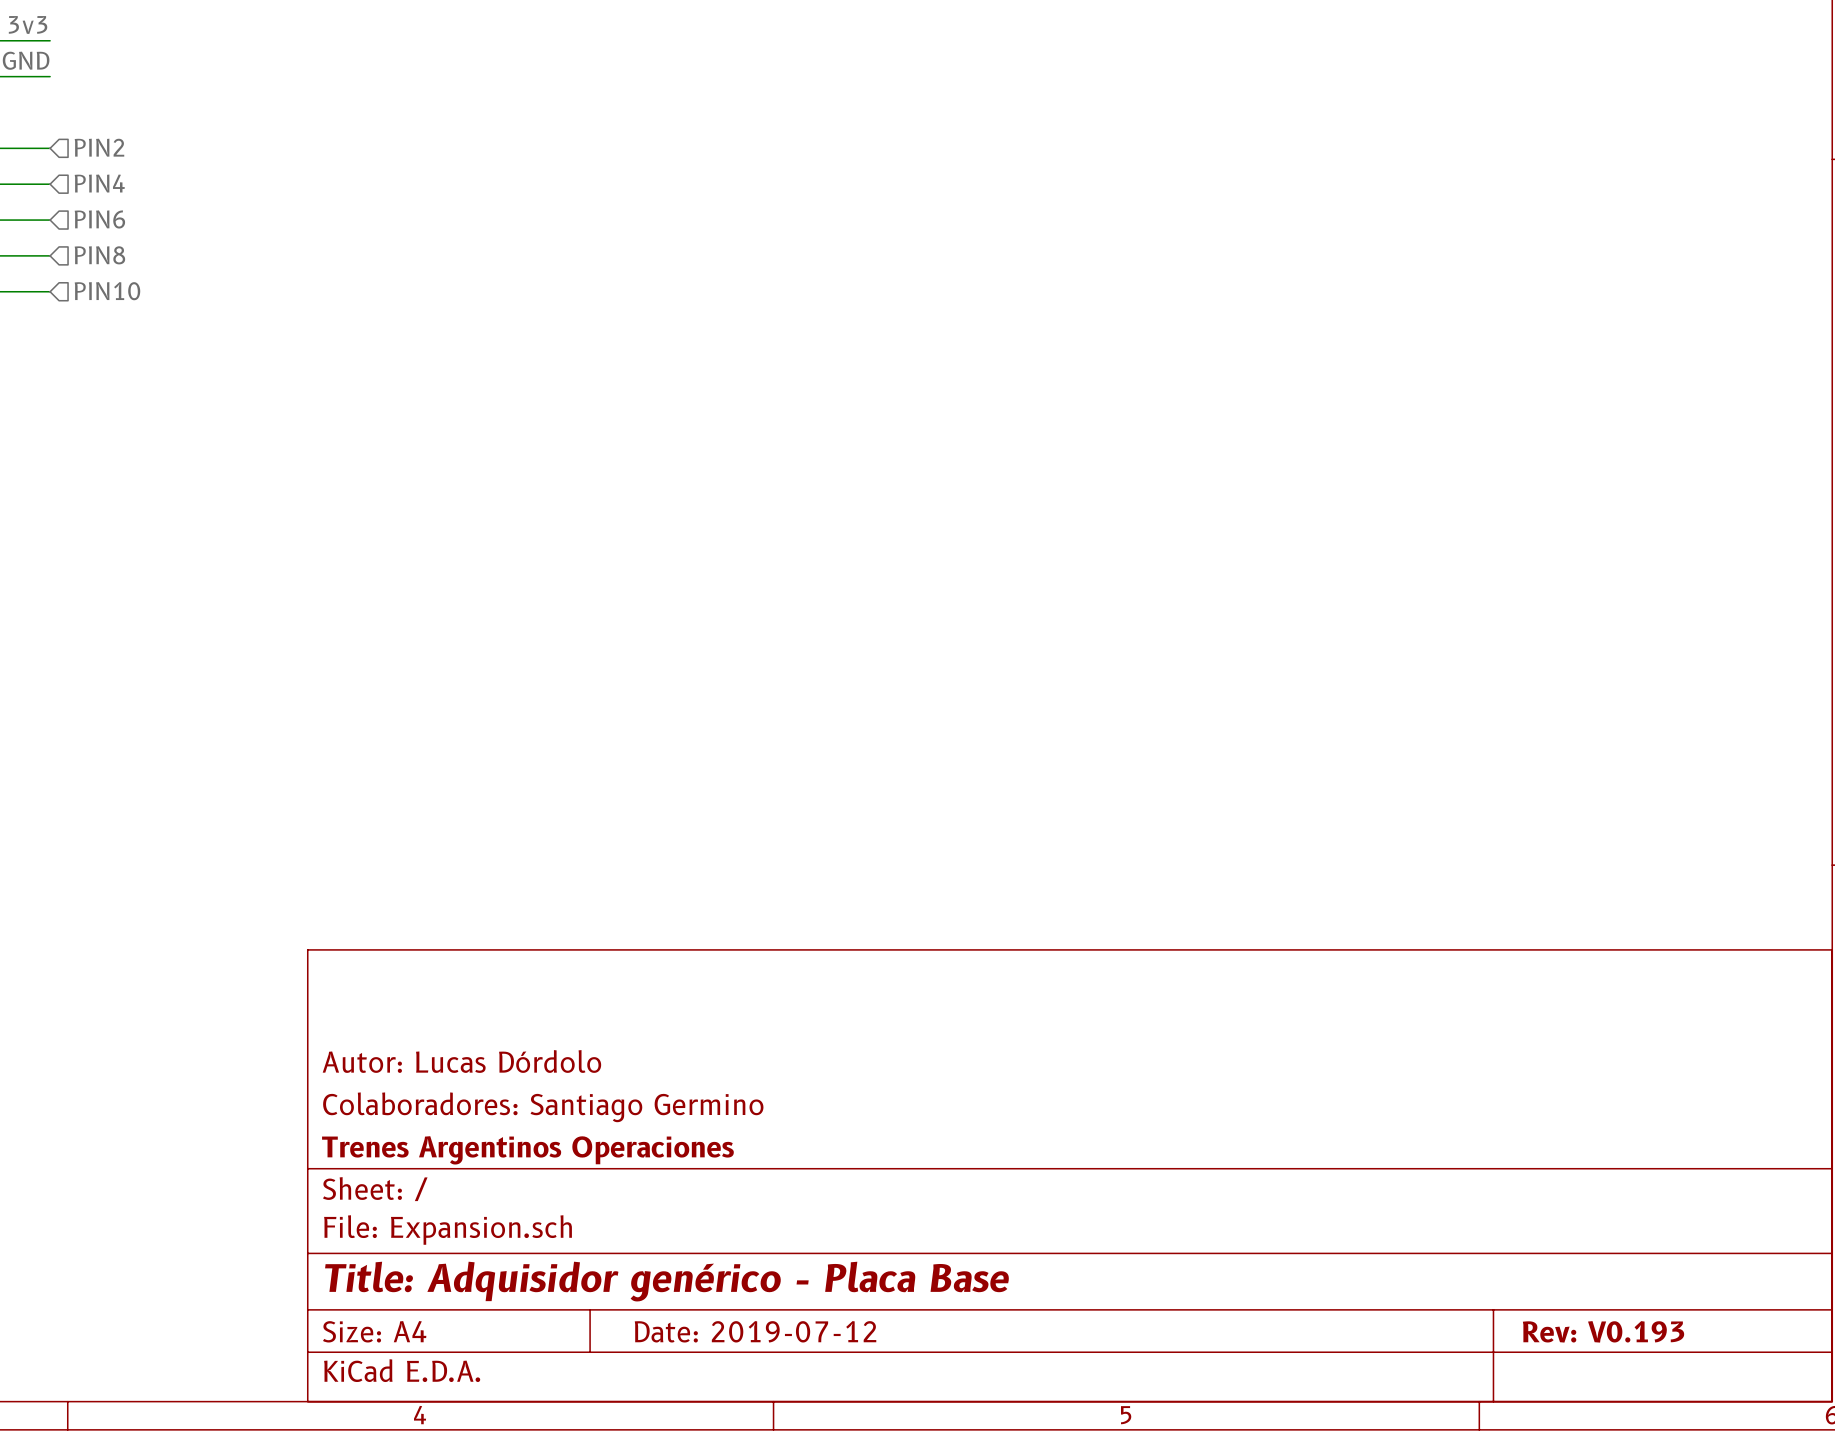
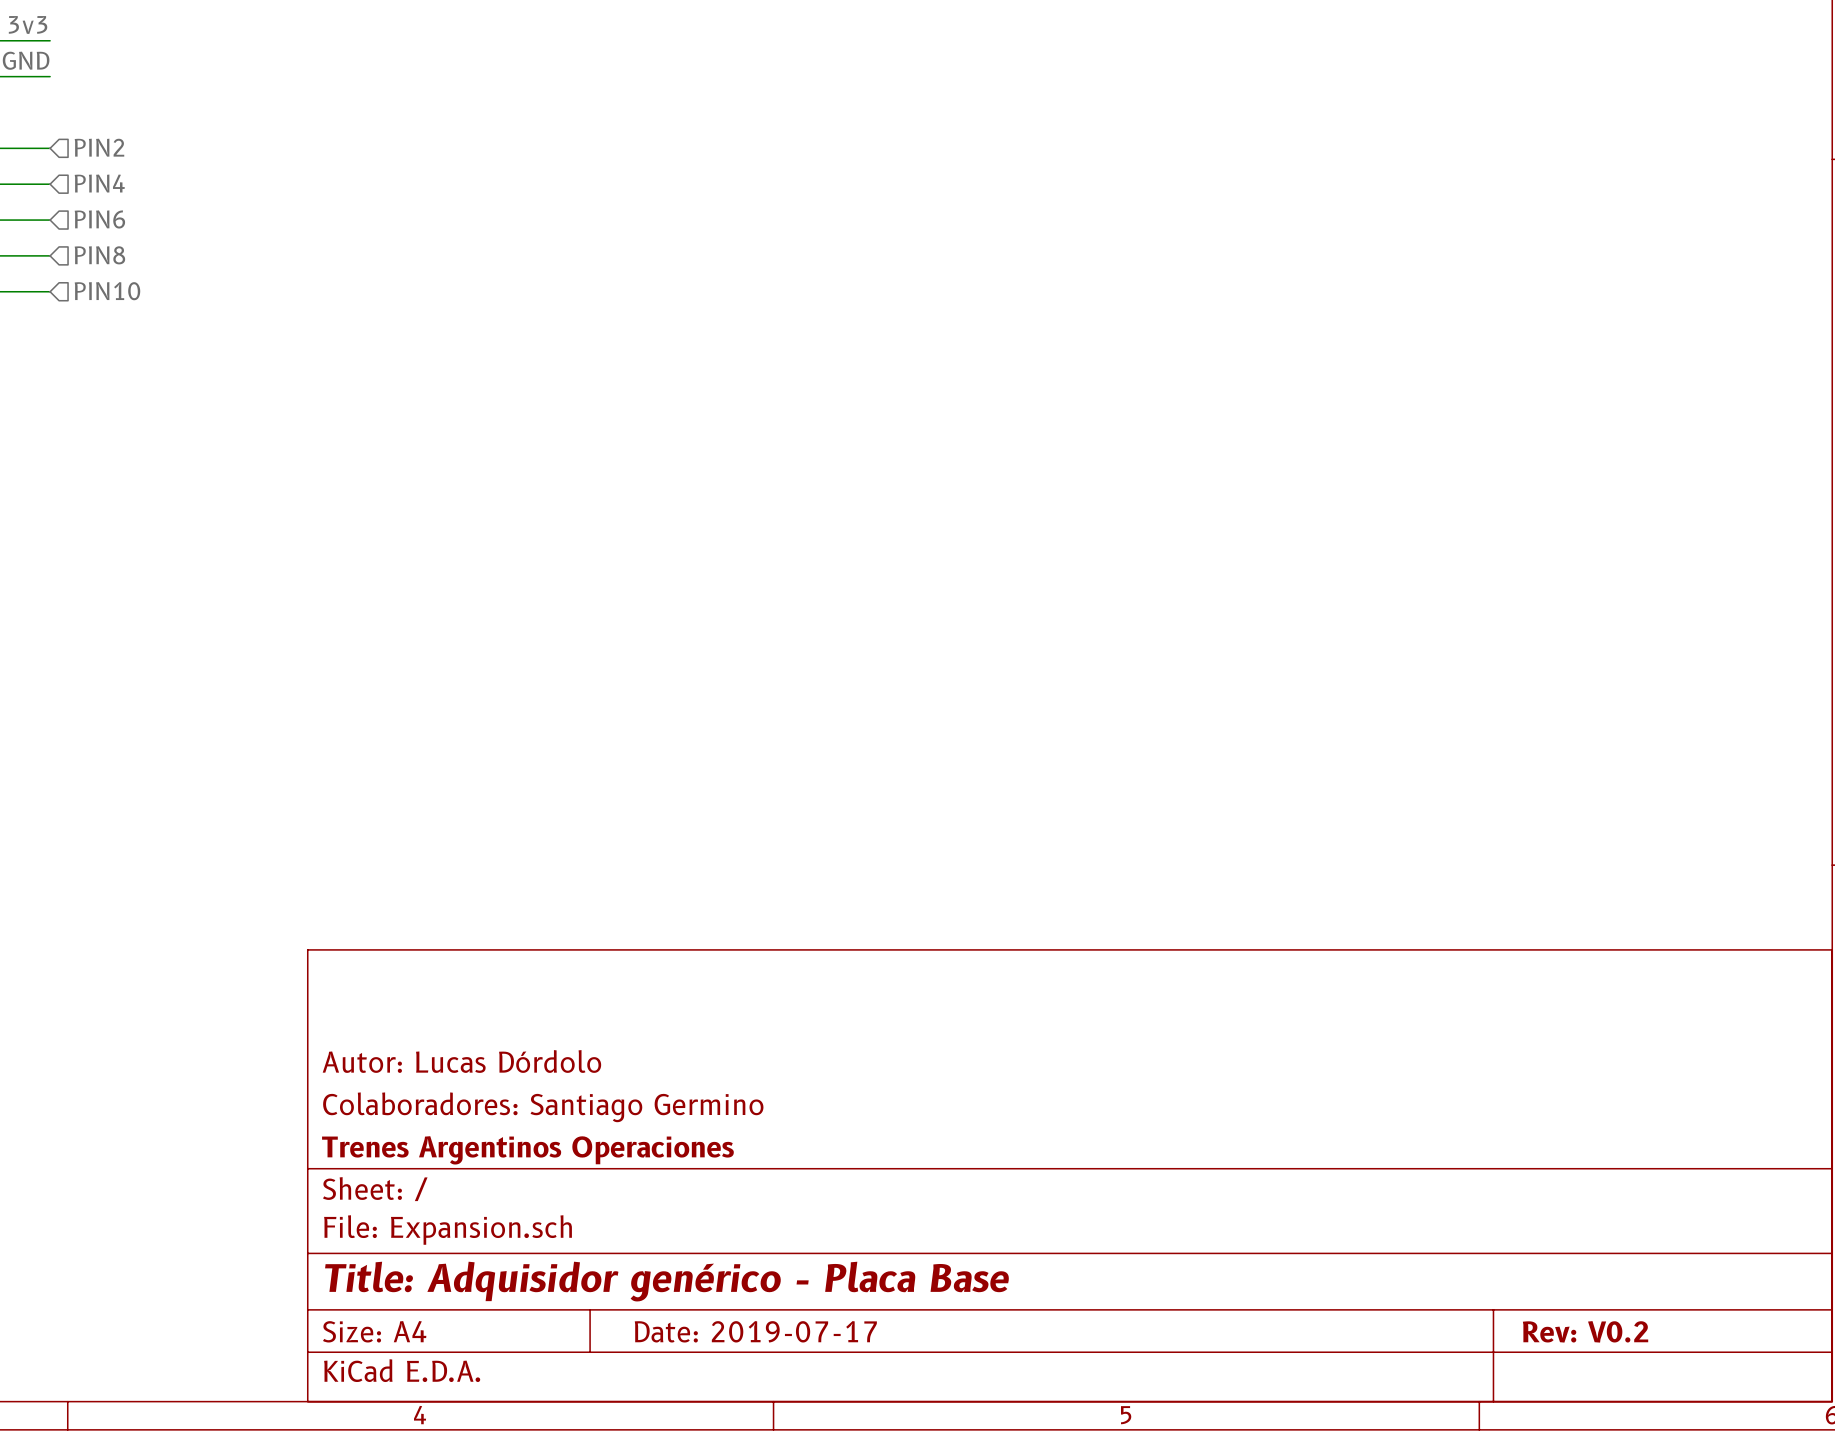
title block: Date: 2019-07-12 (755, 1331) -> Date: 2019-07-17 (755, 1331)
title block: Rev: V0.193 (1603, 1331) -> Rev: V0.2 (1585, 1331)

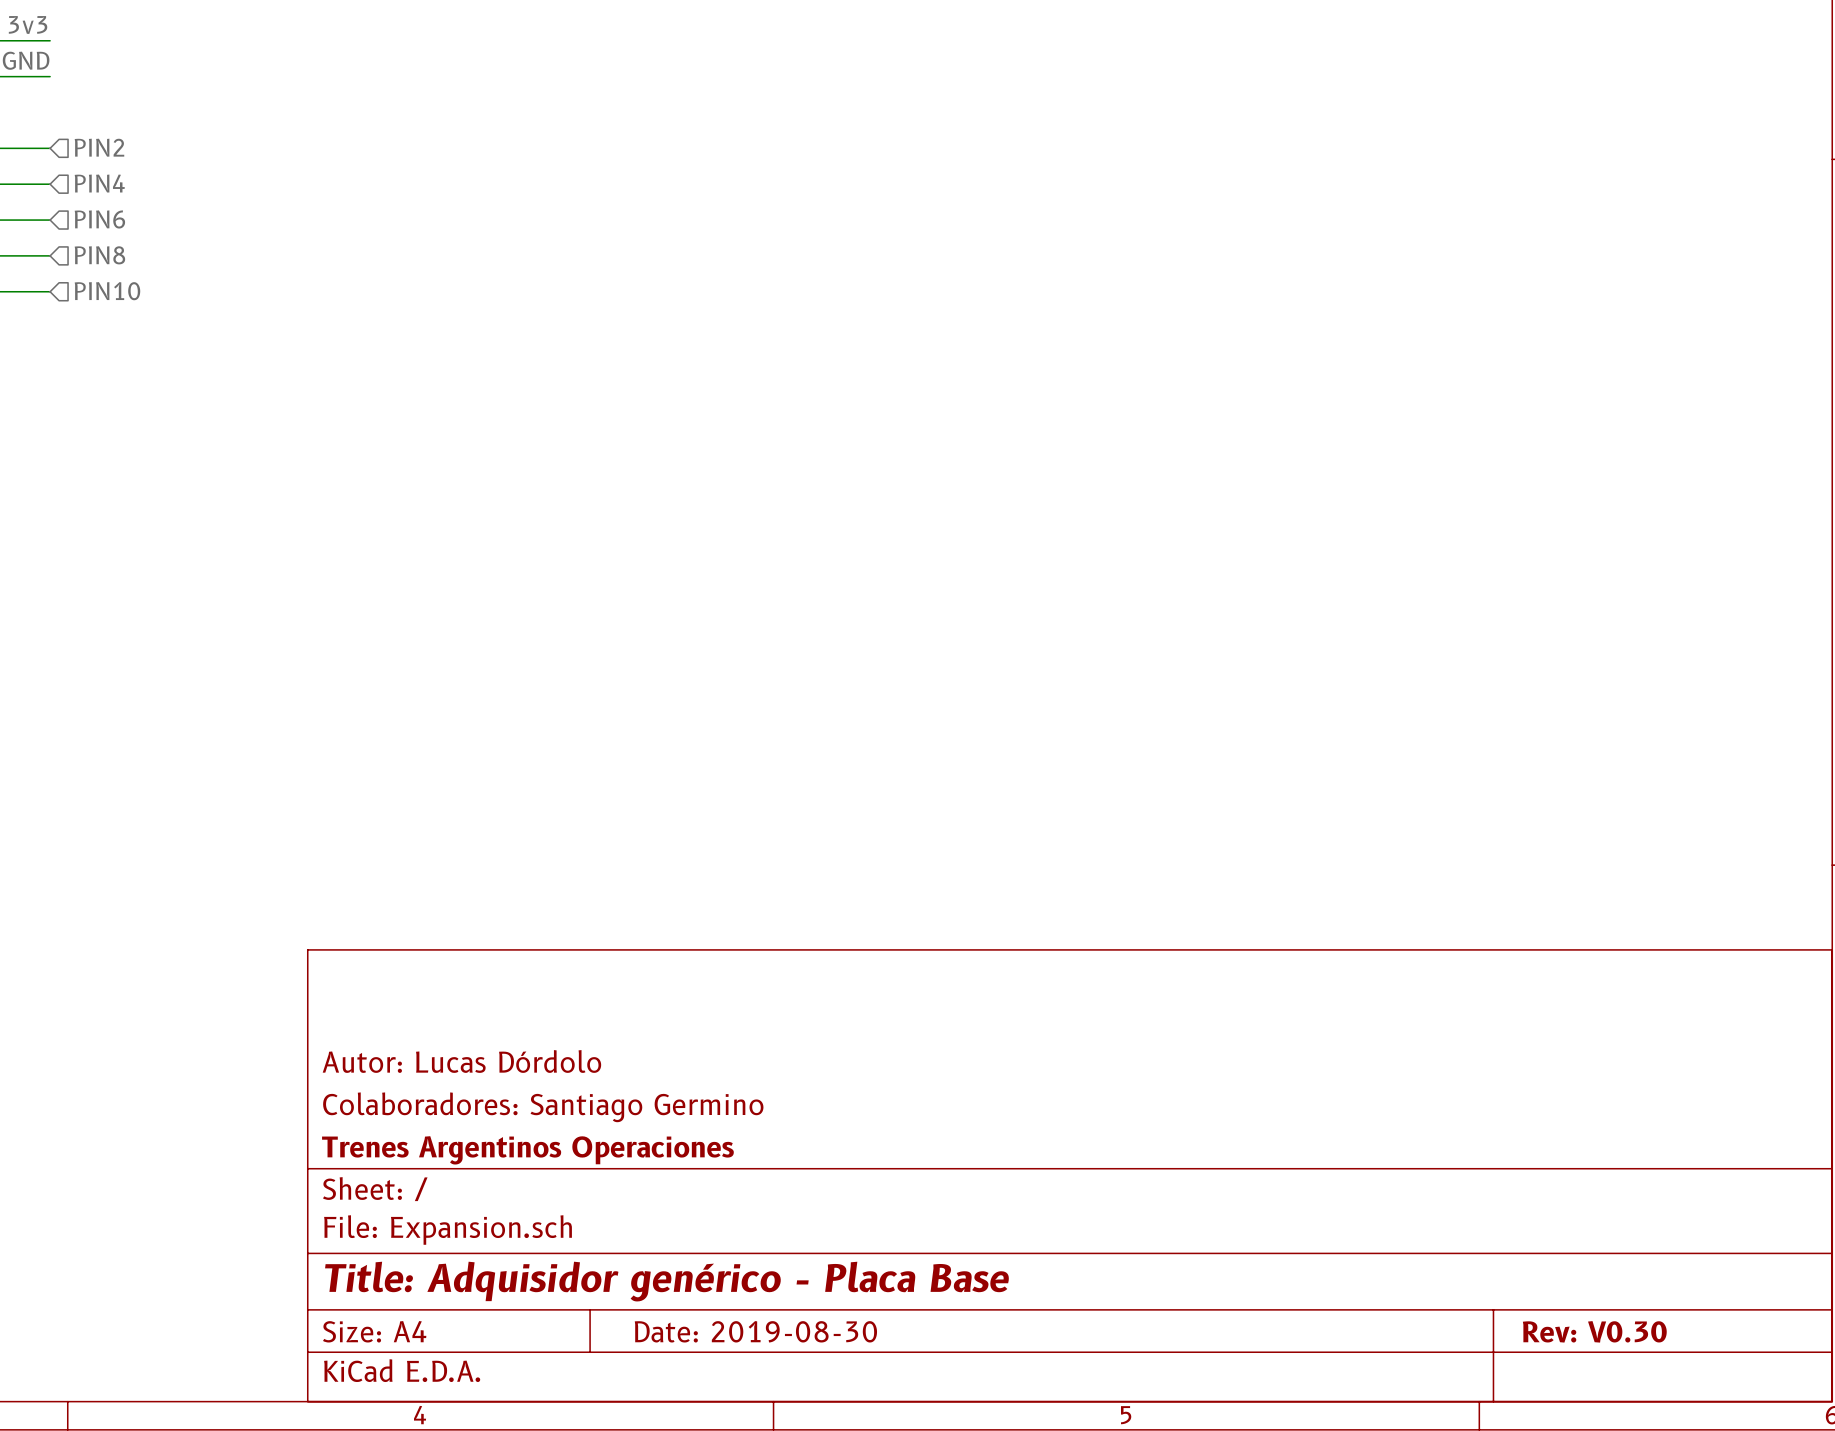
title block: Date: 2019-07-17 (755, 1331) -> Date: 2019-08-30 (755, 1331)
title block: Rev: V0.2 (1585, 1331) -> Rev: V0.30 (1594, 1331)

